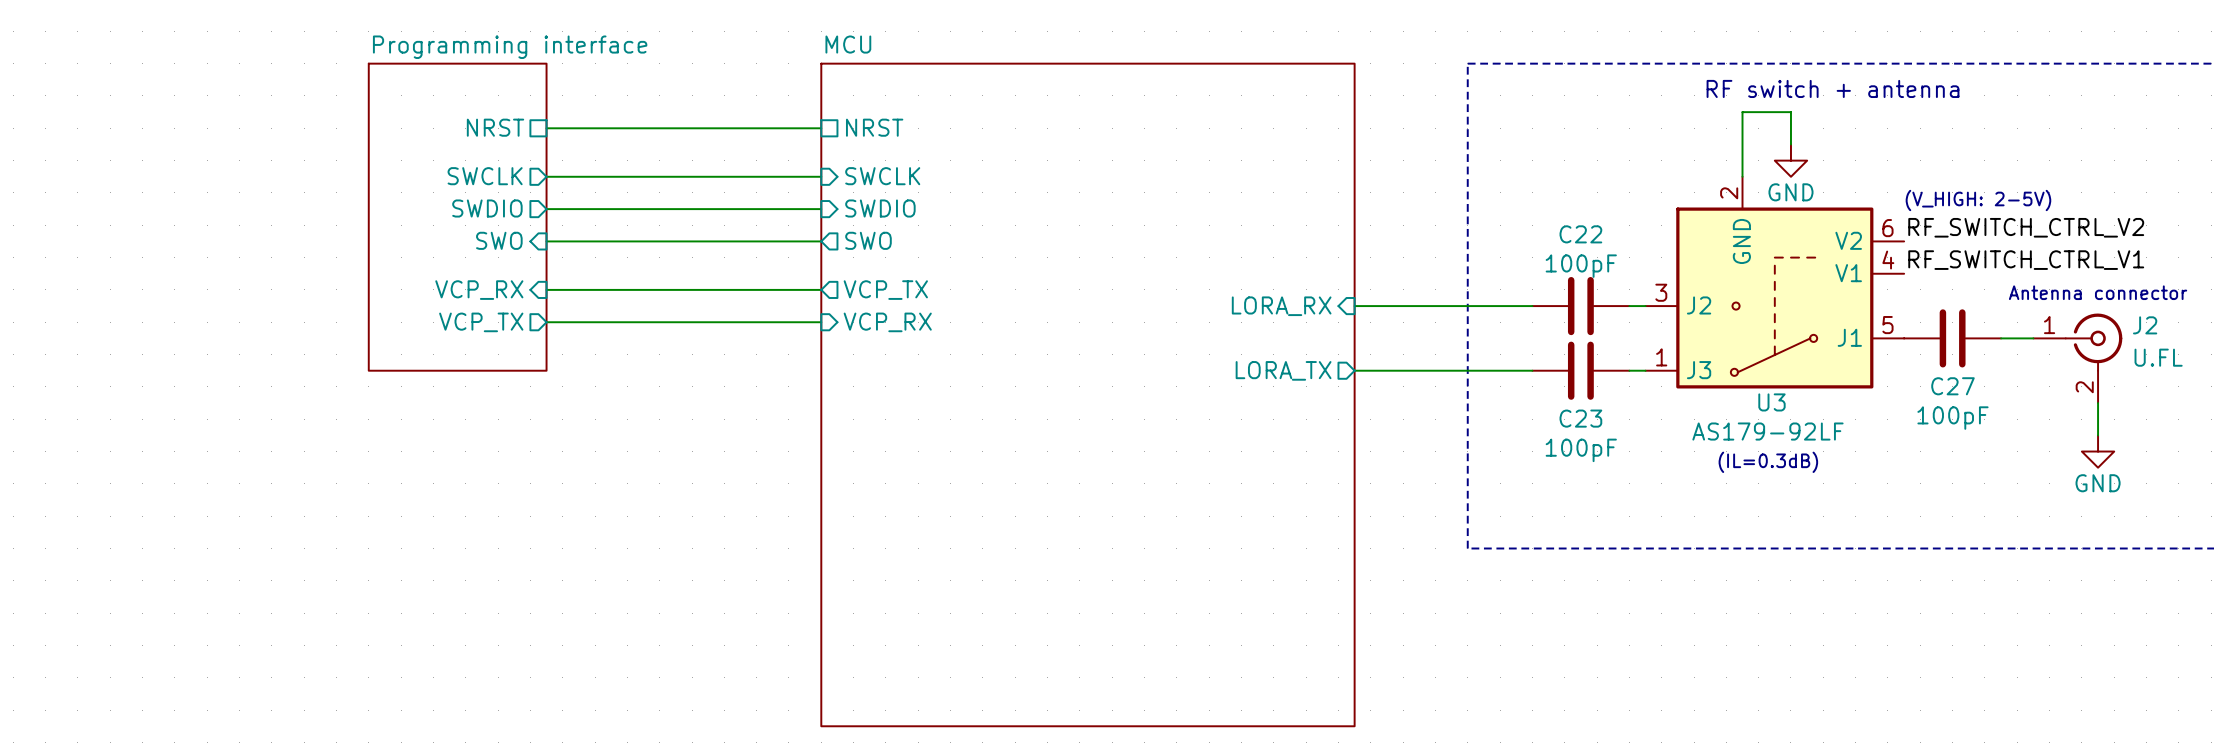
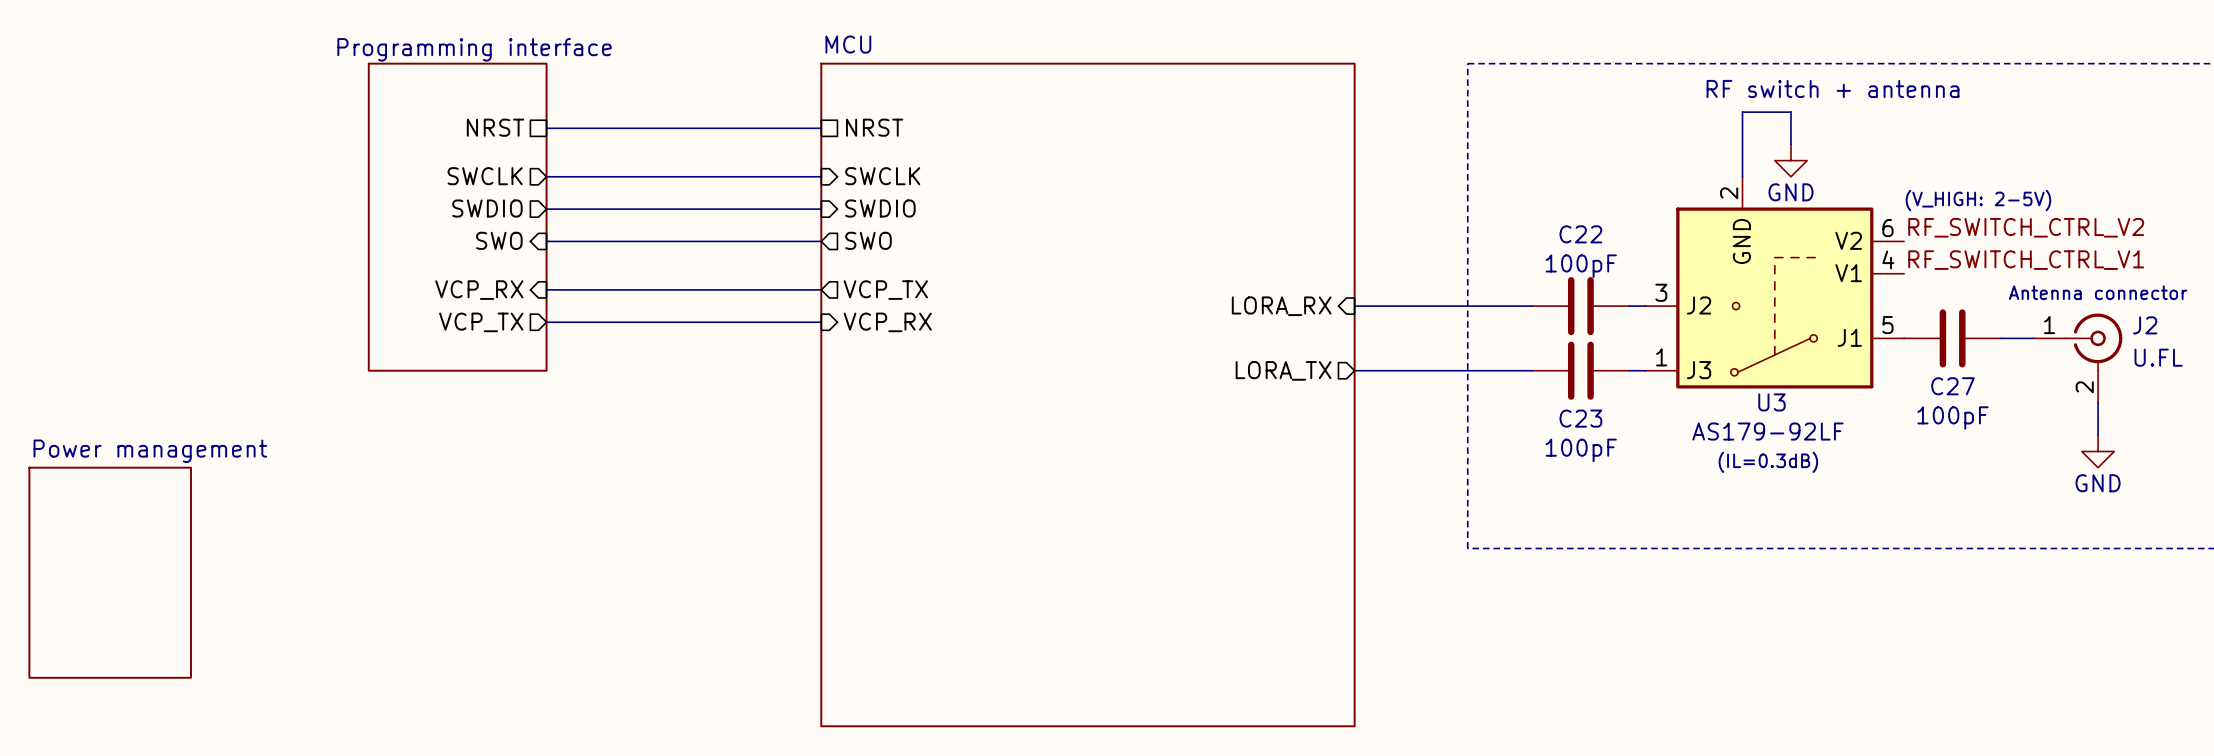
sheet Programming interface name position: Programming interface (510, 47) -> Programming interface (474, 49)
sheet Power management: none -> (110, 572)

